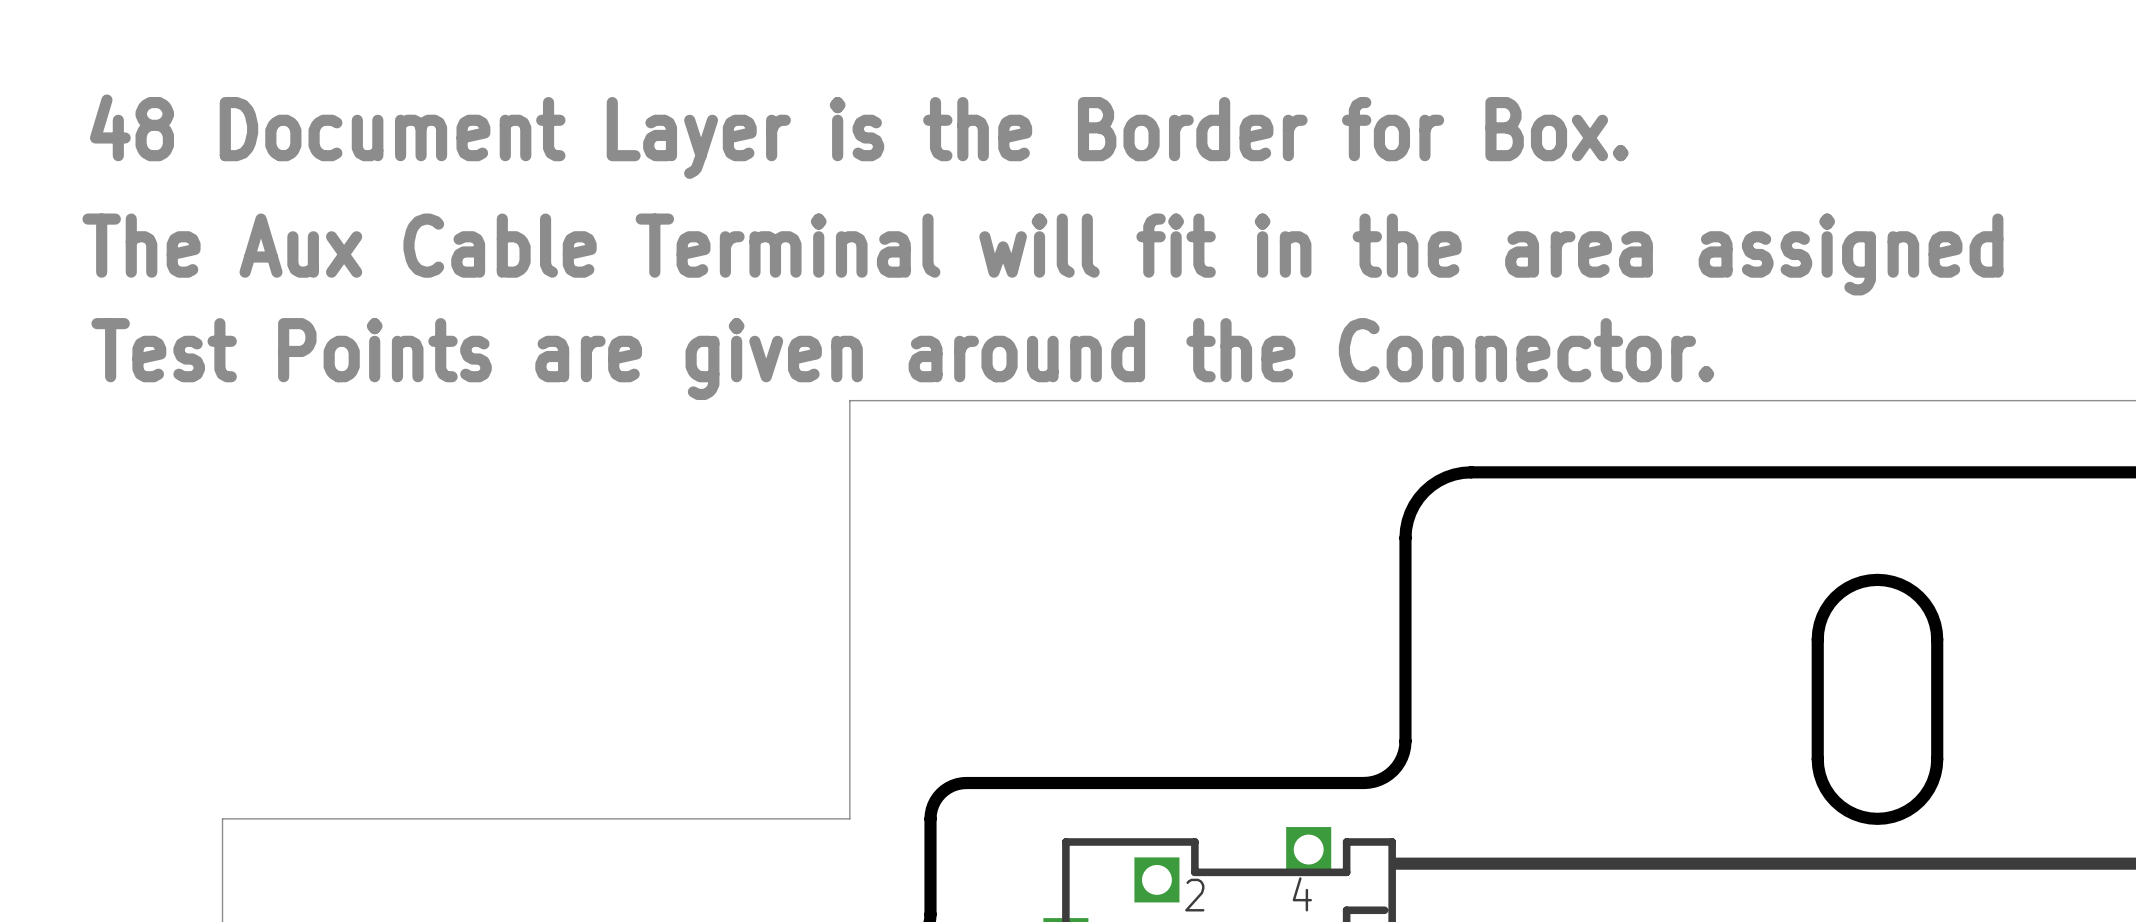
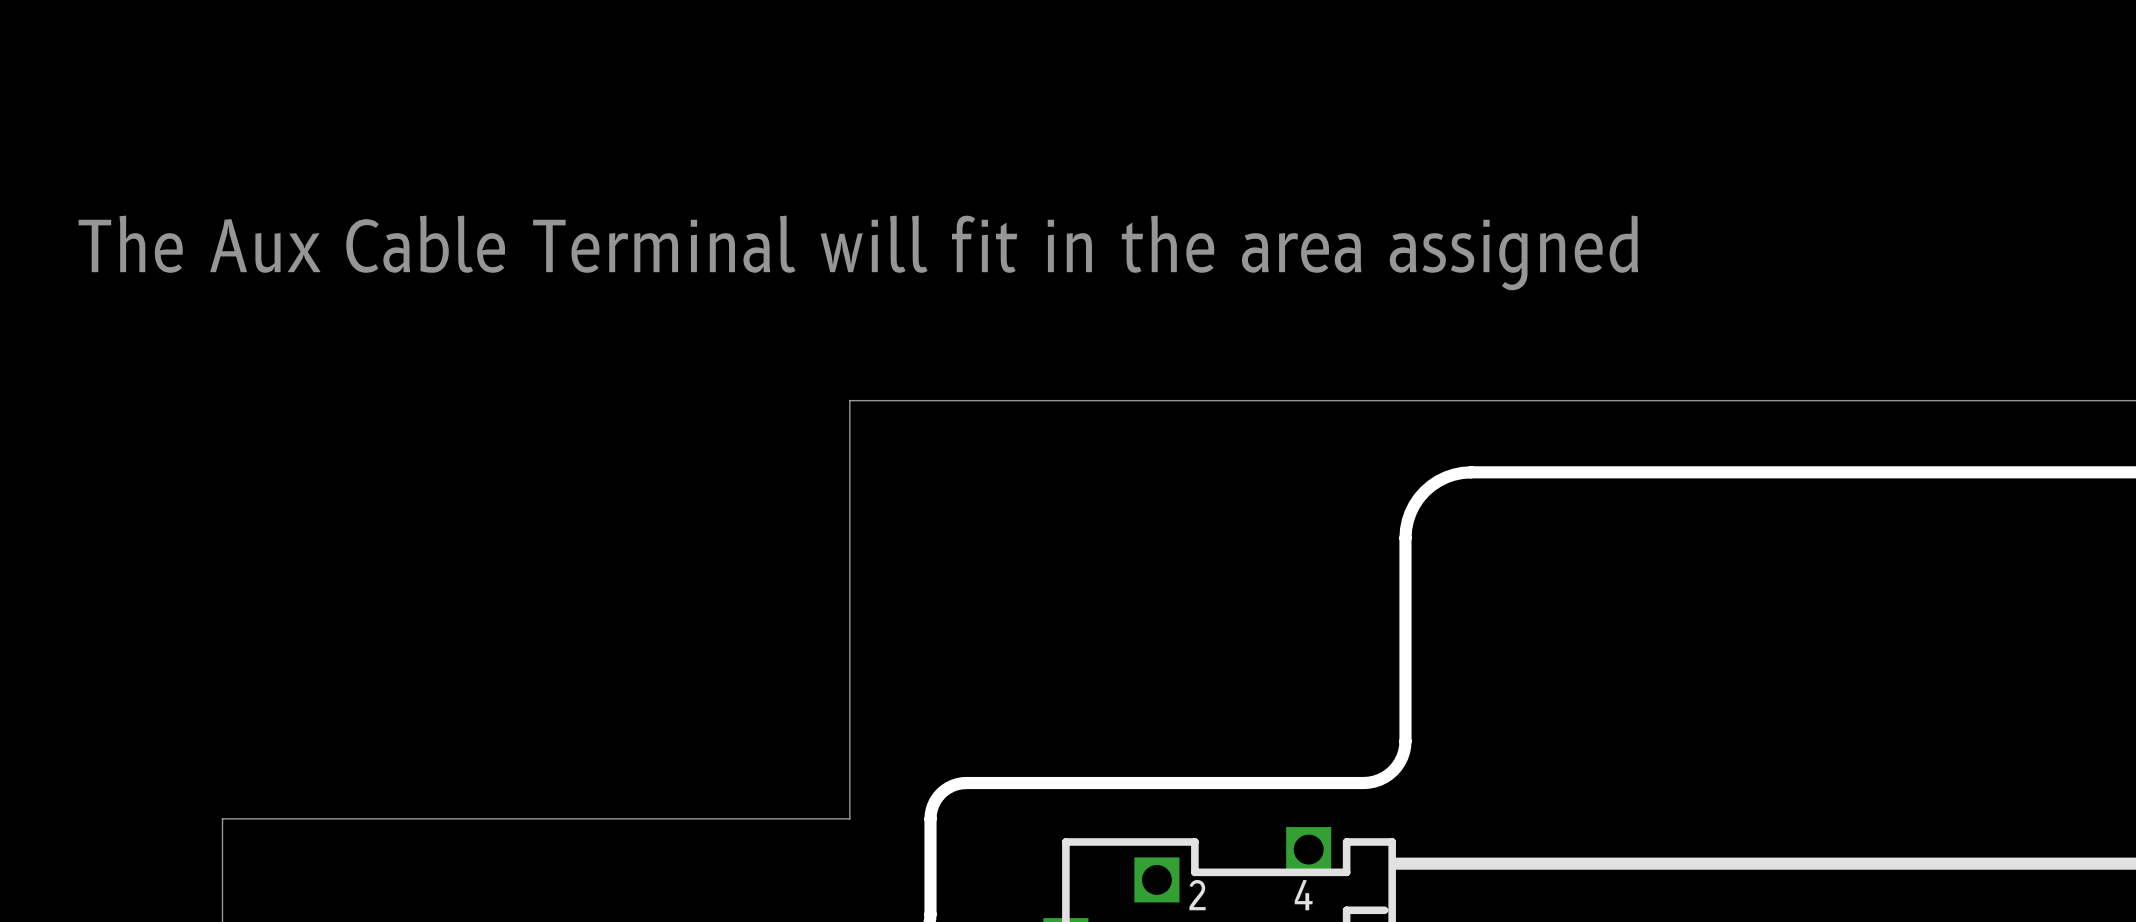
text: 48 Document Layer is the Border for Box. (859, 136) -> none
text: Test Points are given around the Connector. (902, 359) -> none
board edge: (1817, 639) (1817, 759) (1819, 774) (1825, 788) (1841, 806) (1862, 816) (1885, 818) (1907, 810) (1919, 801) (1929, 788) (1936, 766) (1937, 639) (1935, 624) (1929, 609) (1919, 597) (1900, 584) (1885, 580) (1862, 581) (1847, 587) (1830, 603) (1822, 616) (1817, 639) -> none

